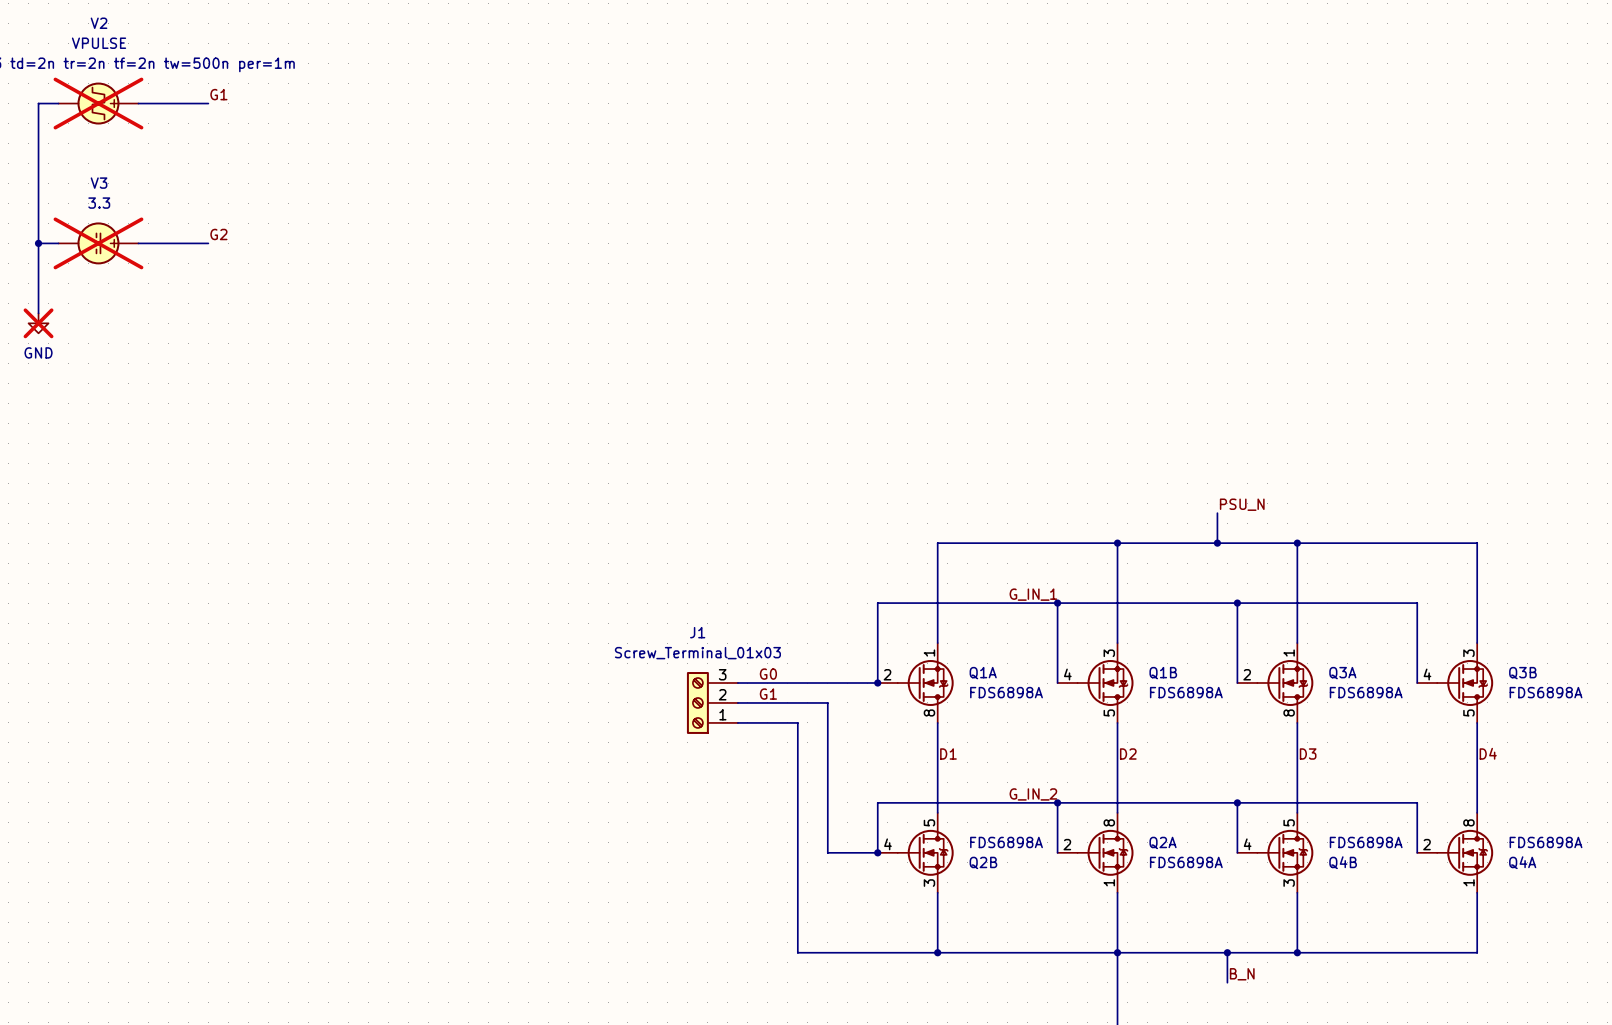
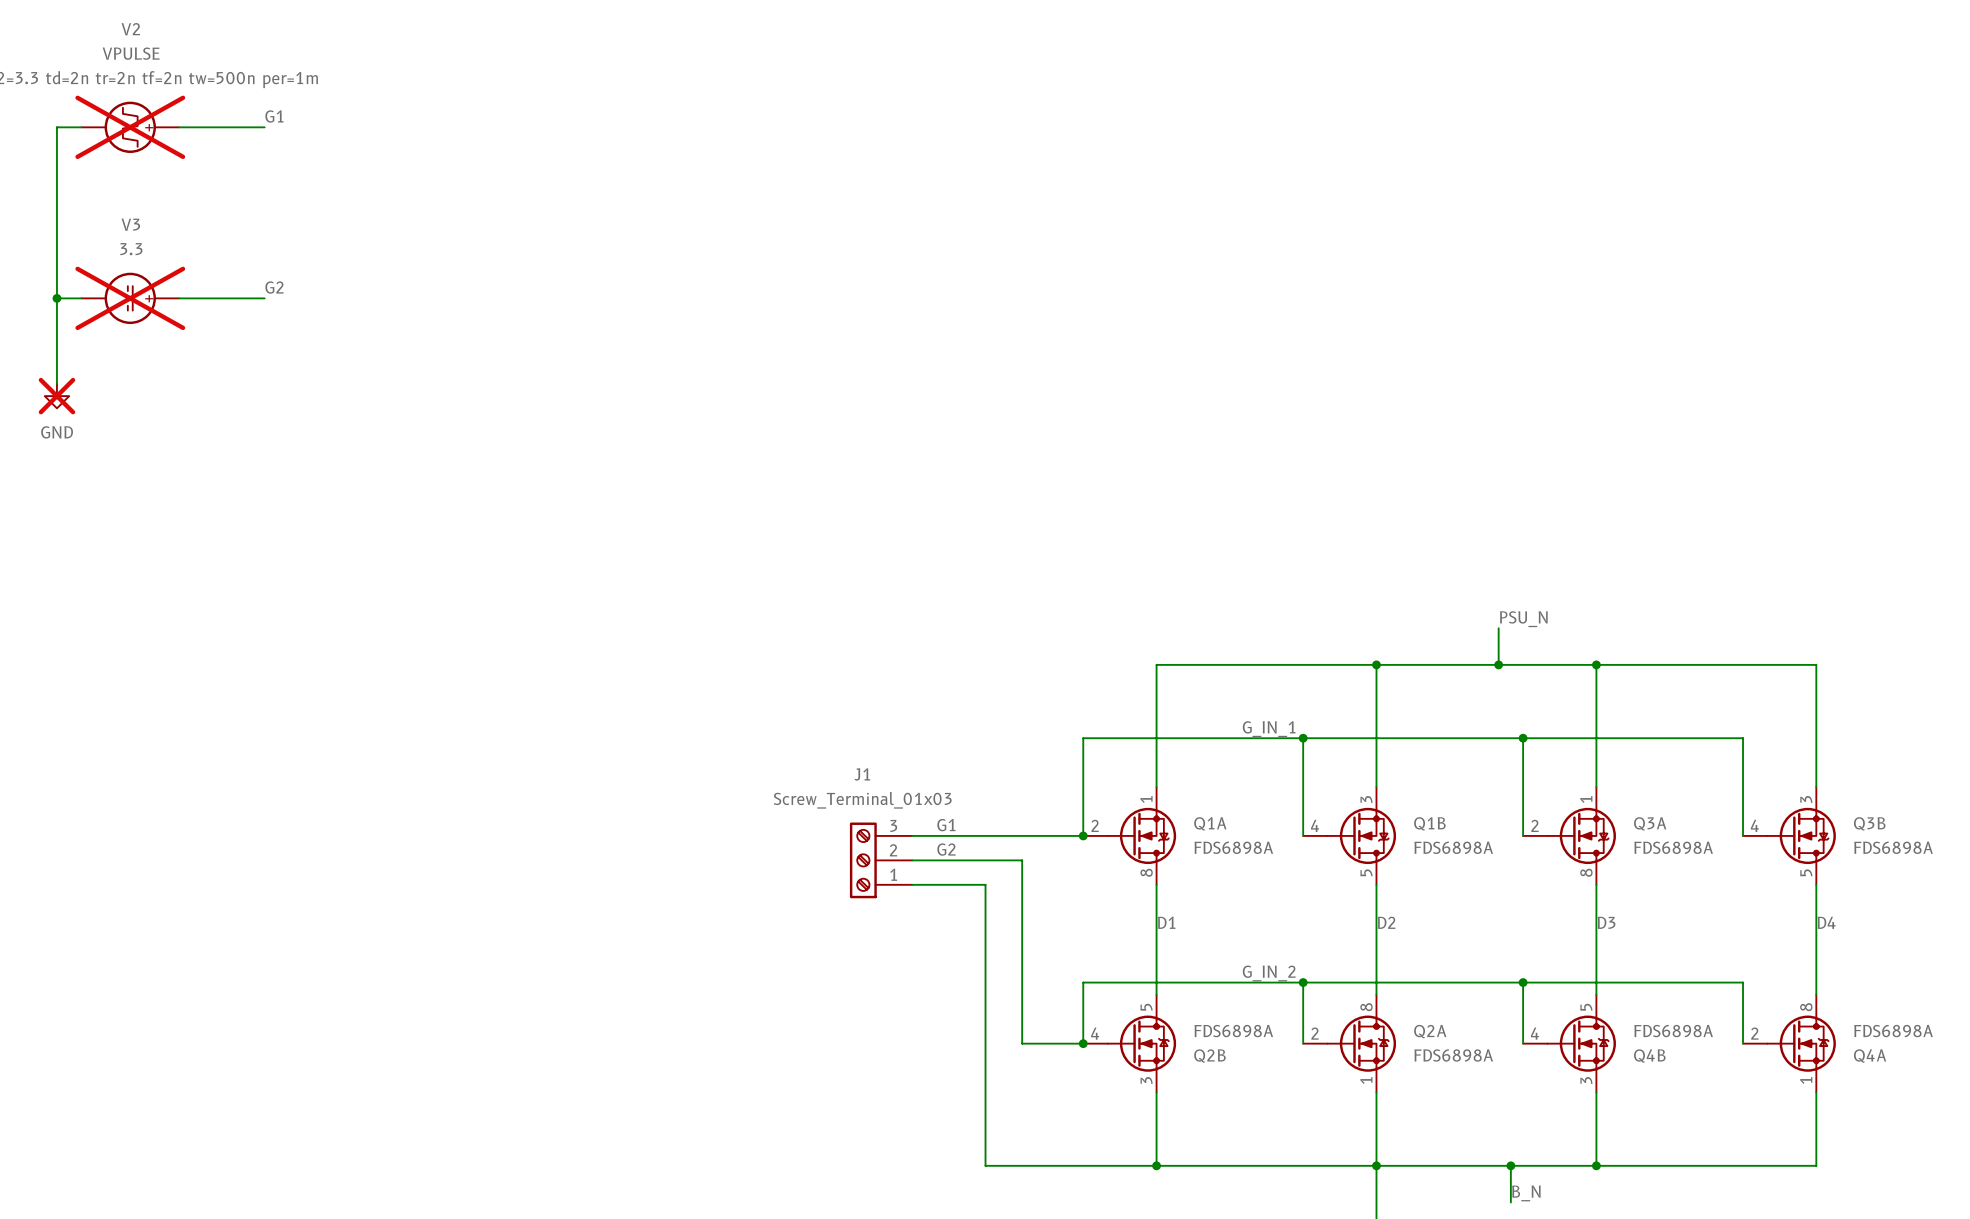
label: G0 (768, 674) -> G1 (946, 825)
label: G1 (768, 694) -> G2 (946, 849)

